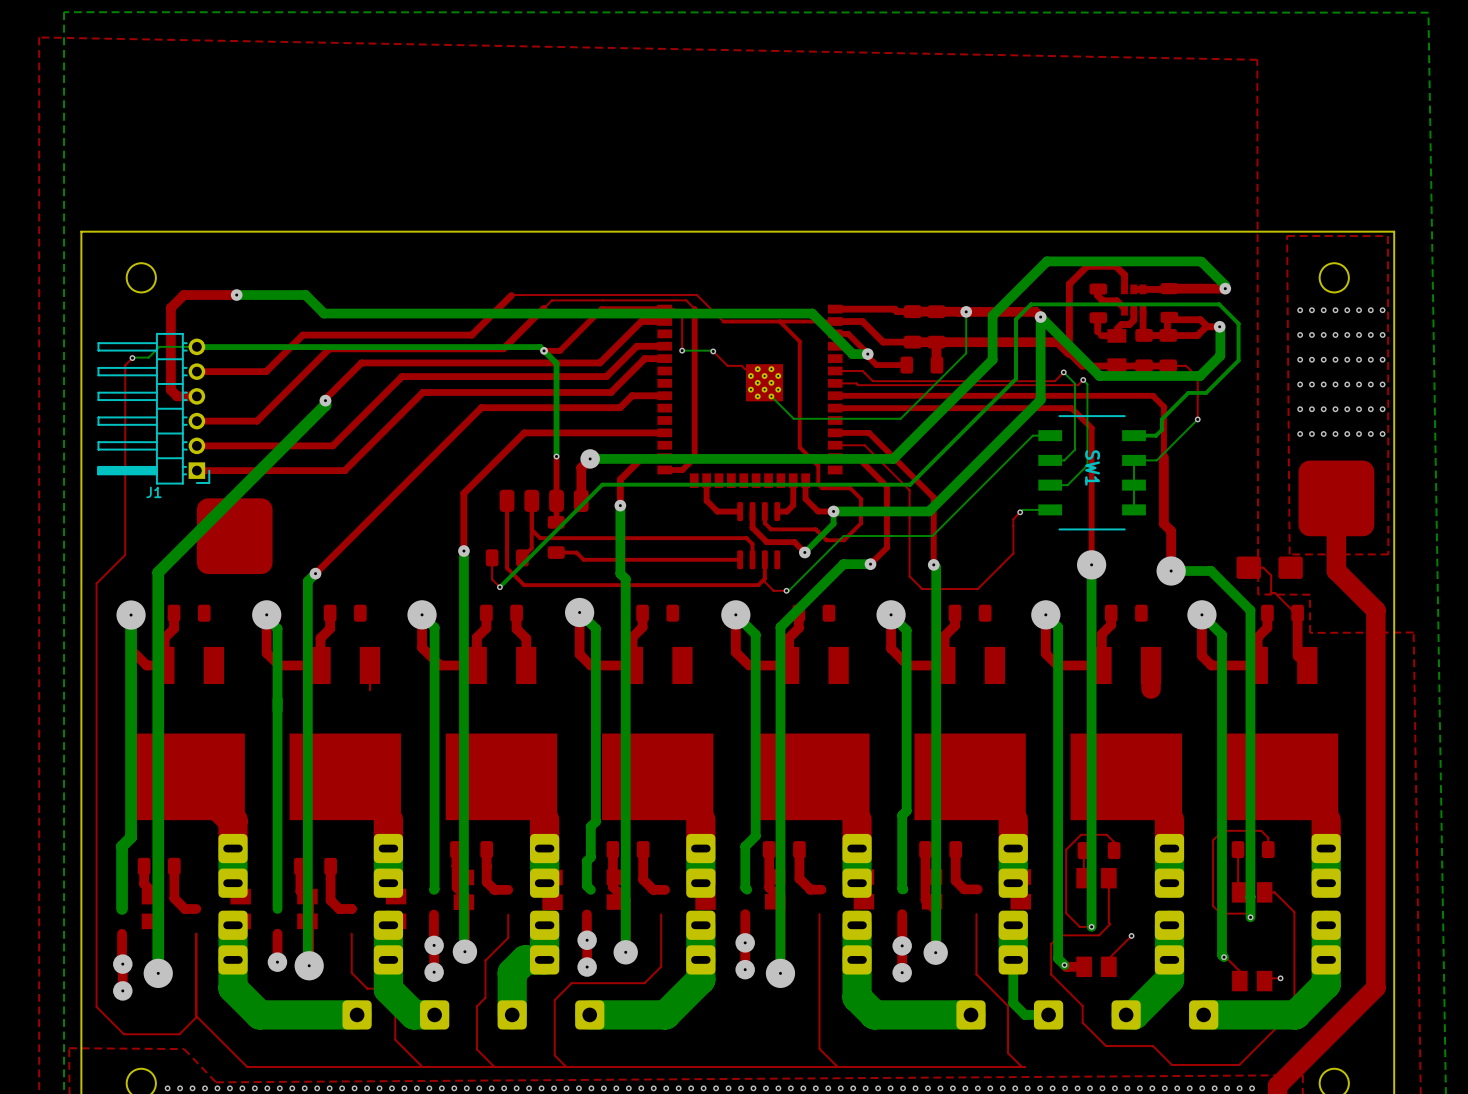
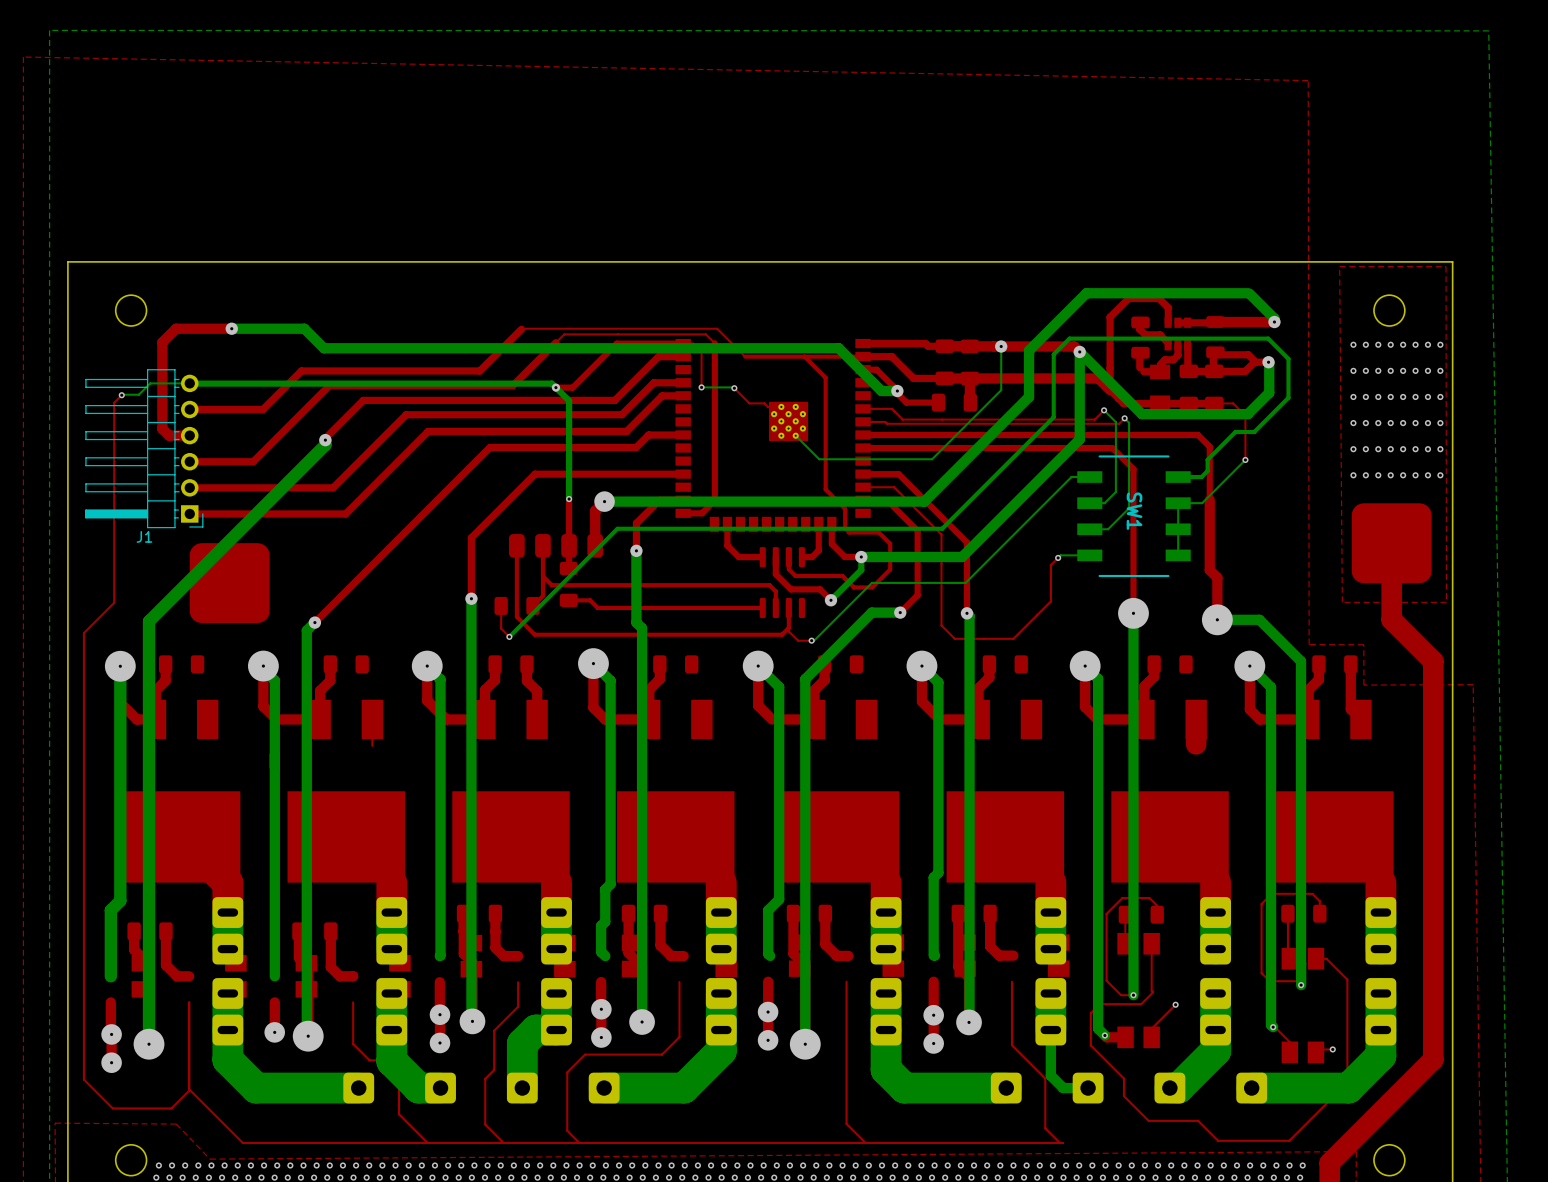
top track: (1248, 567) (1263, 567) (1271, 575) (1271, 593) (1275, 593) (1295, 613) (1297, 613) -> none
part: (1269, 567) -> none

